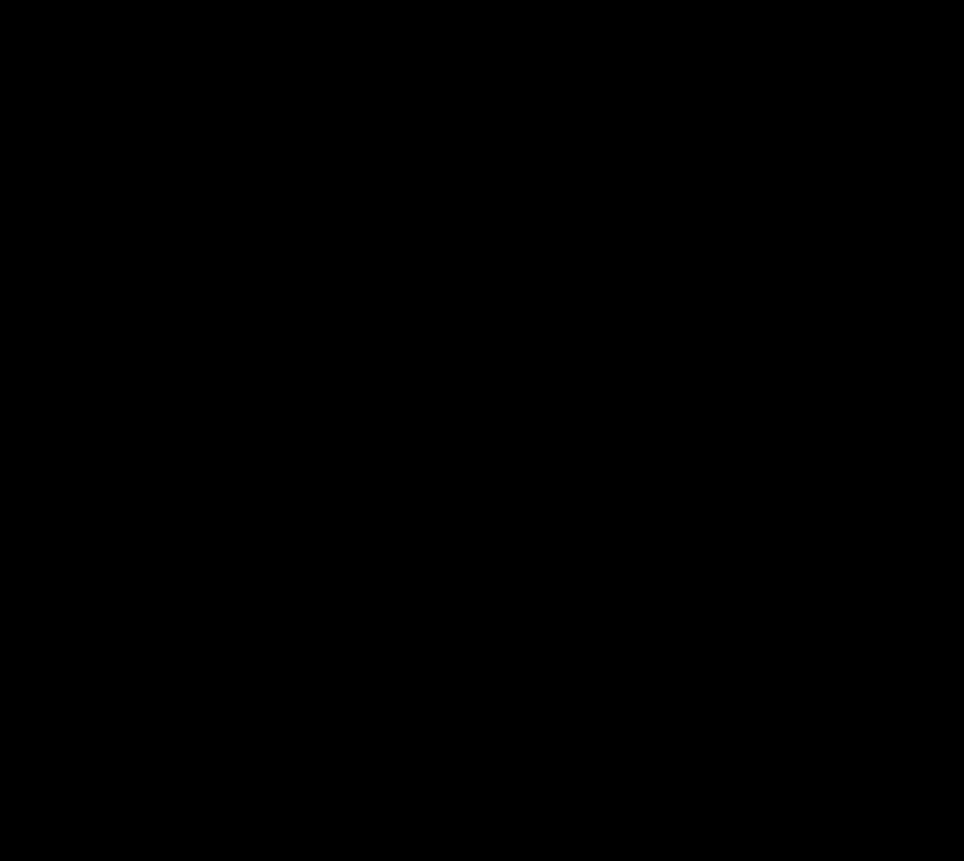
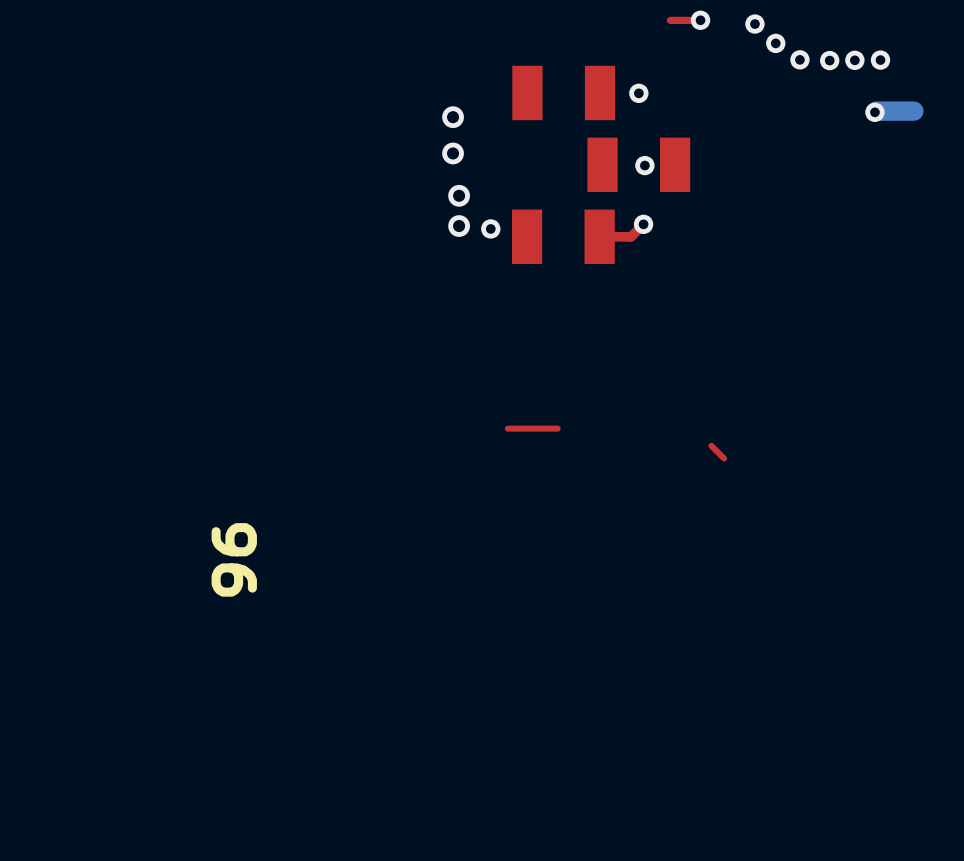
top track: none -> (700, 20) (670, 20)
via: none -> (700, 20)
via: none -> (754, 24)
via: none -> (775, 43)
via: none -> (799, 59)
via: none -> (829, 60)
via: none -> (854, 60)
via: none -> (880, 60)
part: none -> (563, 92)
via: none -> (638, 93)
bottom track: none -> (913, 111) (874, 112)
via: none -> (874, 112)
via: none -> (453, 117)
via: none -> (453, 153)
part: none -> (638, 164)
via: none -> (644, 165)
via: none -> (459, 195)
top track: none -> (643, 224) (631, 236) (599, 236)
via: none -> (643, 224)
via: none -> (459, 226)
via: none -> (490, 228)
part: none -> (563, 236)
top track: none -> (557, 428) (507, 428)
top track: none -> (711, 445) (724, 458)
text: none -> 96 (234, 559)

